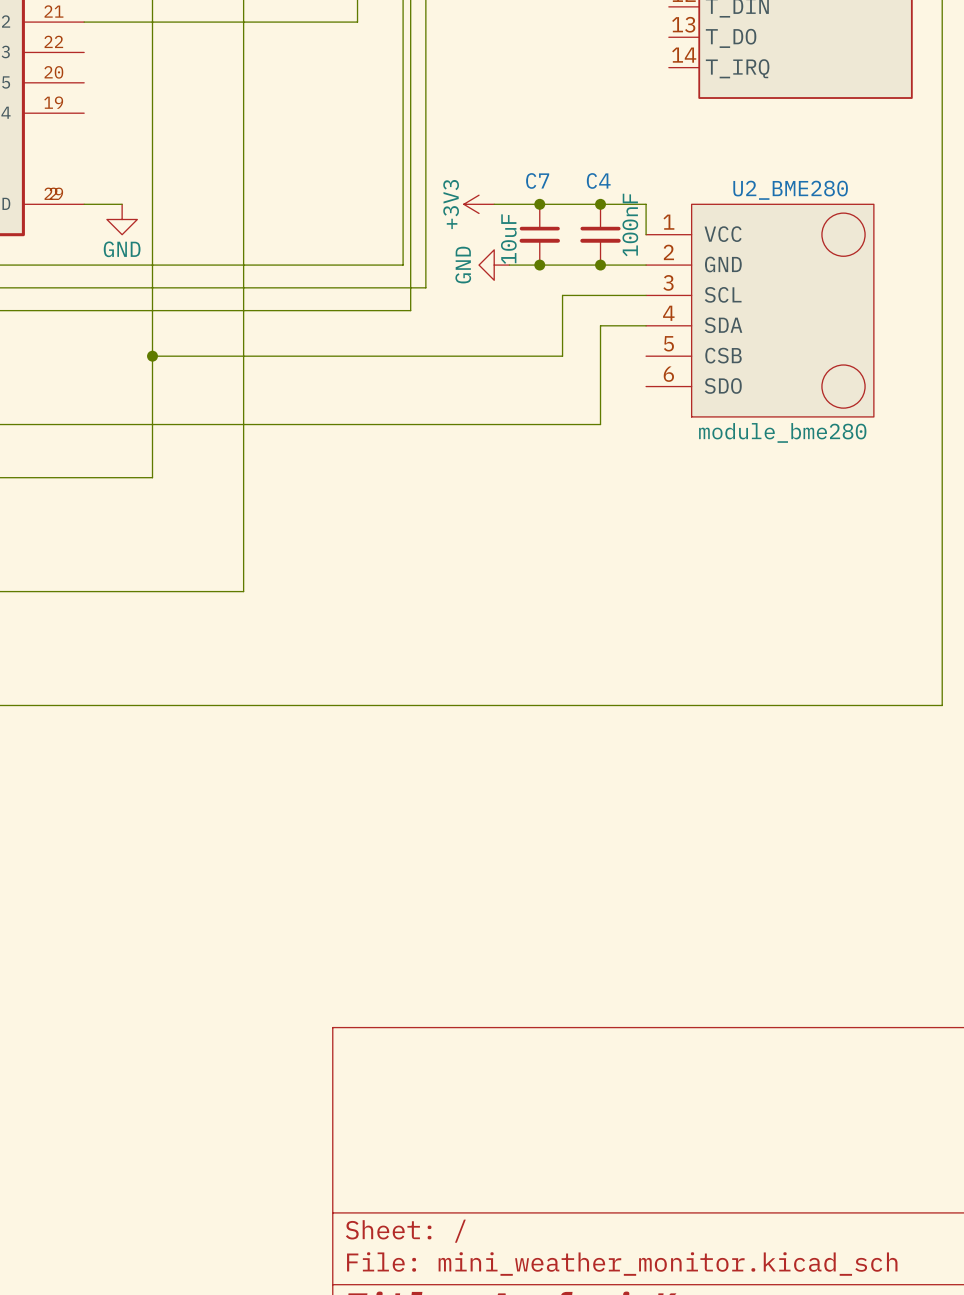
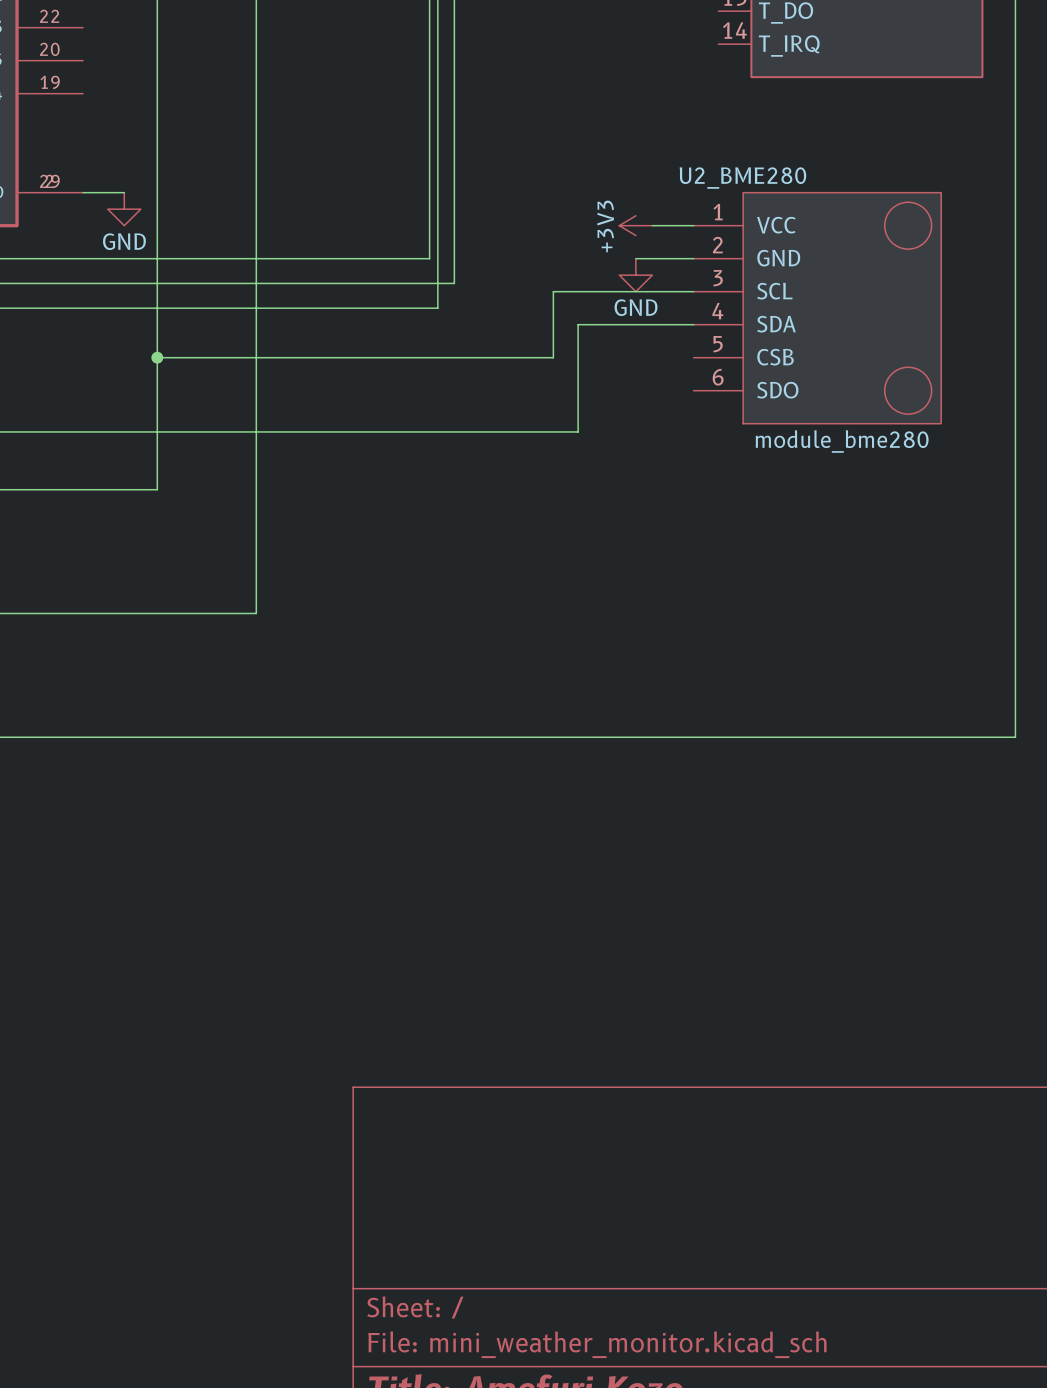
U2_BME280 name position: U2_BME280 (790, 190) -> U2_BME280 (742, 178)
power symbol position: +3V3 (479, 204) -> +3V3 (635, 225)
wire: (494, 204) (646, 204) (646, 234) -> (652, 225) (693, 225)
junction: (539, 204) -> none
junction: (600, 204) -> none
C7: 10uF (539, 234) -> none
C4: 100nF (600, 234) -> none
power symbol rotation: 0° (494, 265) -> 90° counterclockwise (635, 275)
power symbol position: GND (494, 265) -> GND (635, 275)
wire: (509, 265) (592, 265) -> none
junction: (539, 265) -> none
junction: (600, 265) -> none
wire: (562, 295) (562, 356) (516, 356) -> (602, 291) (553, 291) (553, 357)
wire: (600, 325) (600, 424) (539, 424) -> (644, 324) (578, 324) (578, 431)

